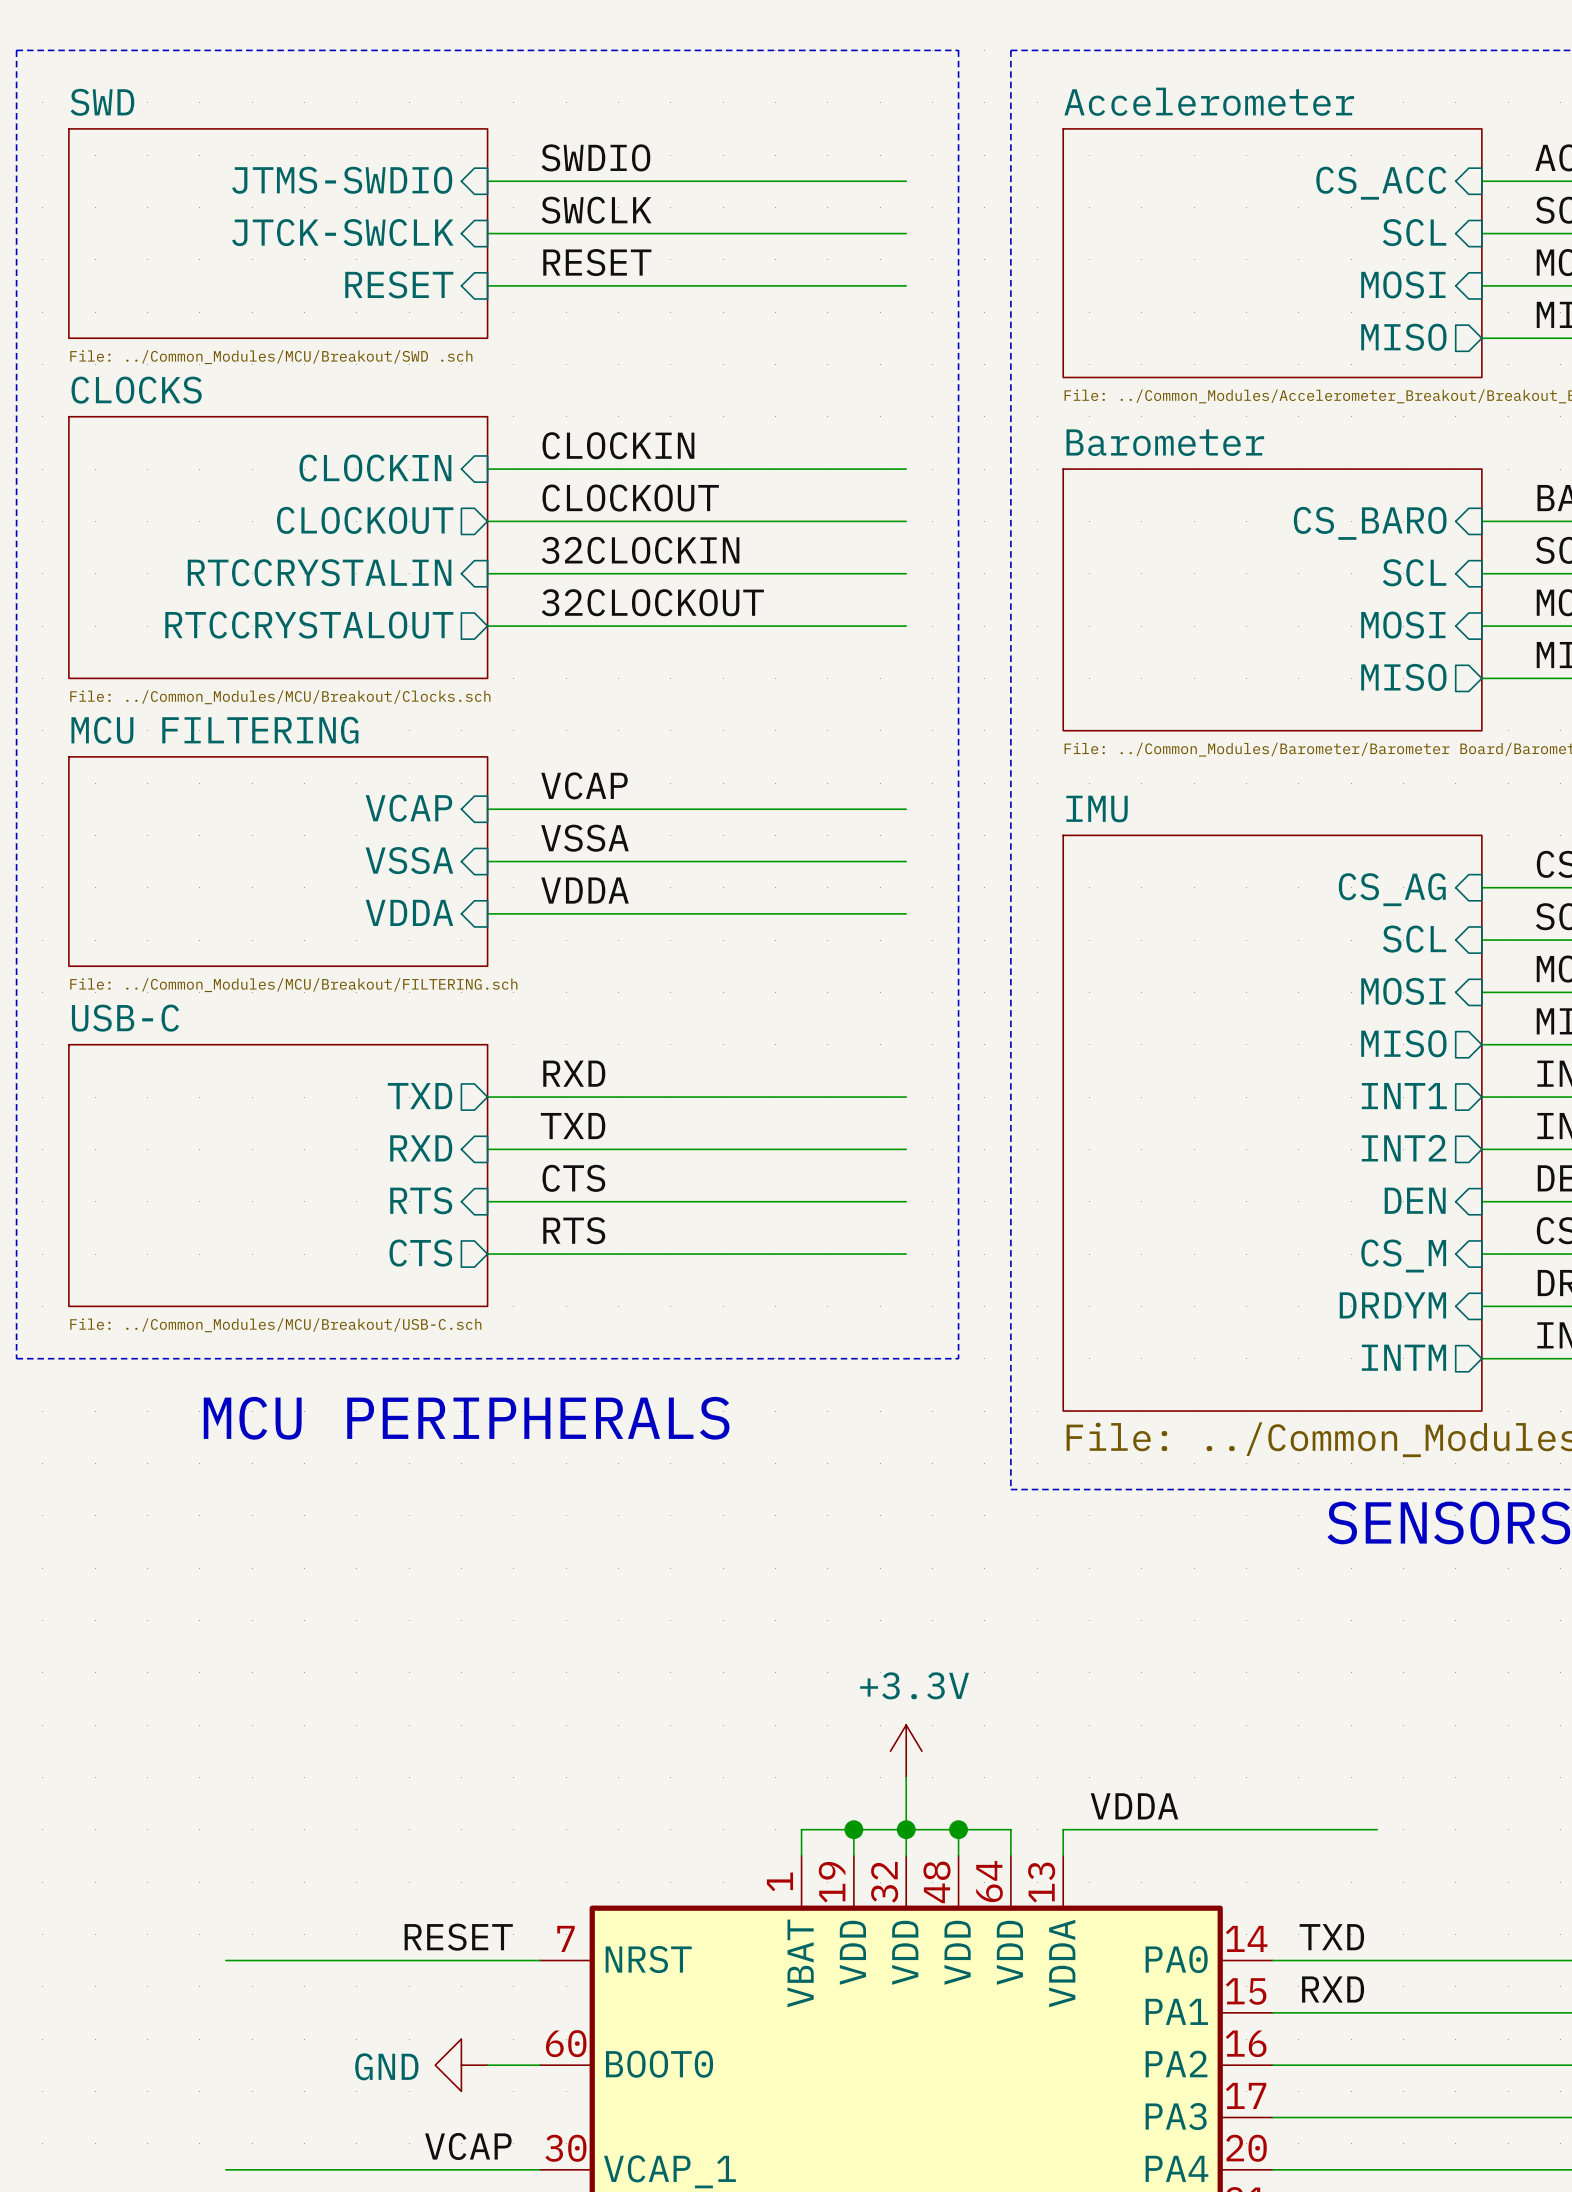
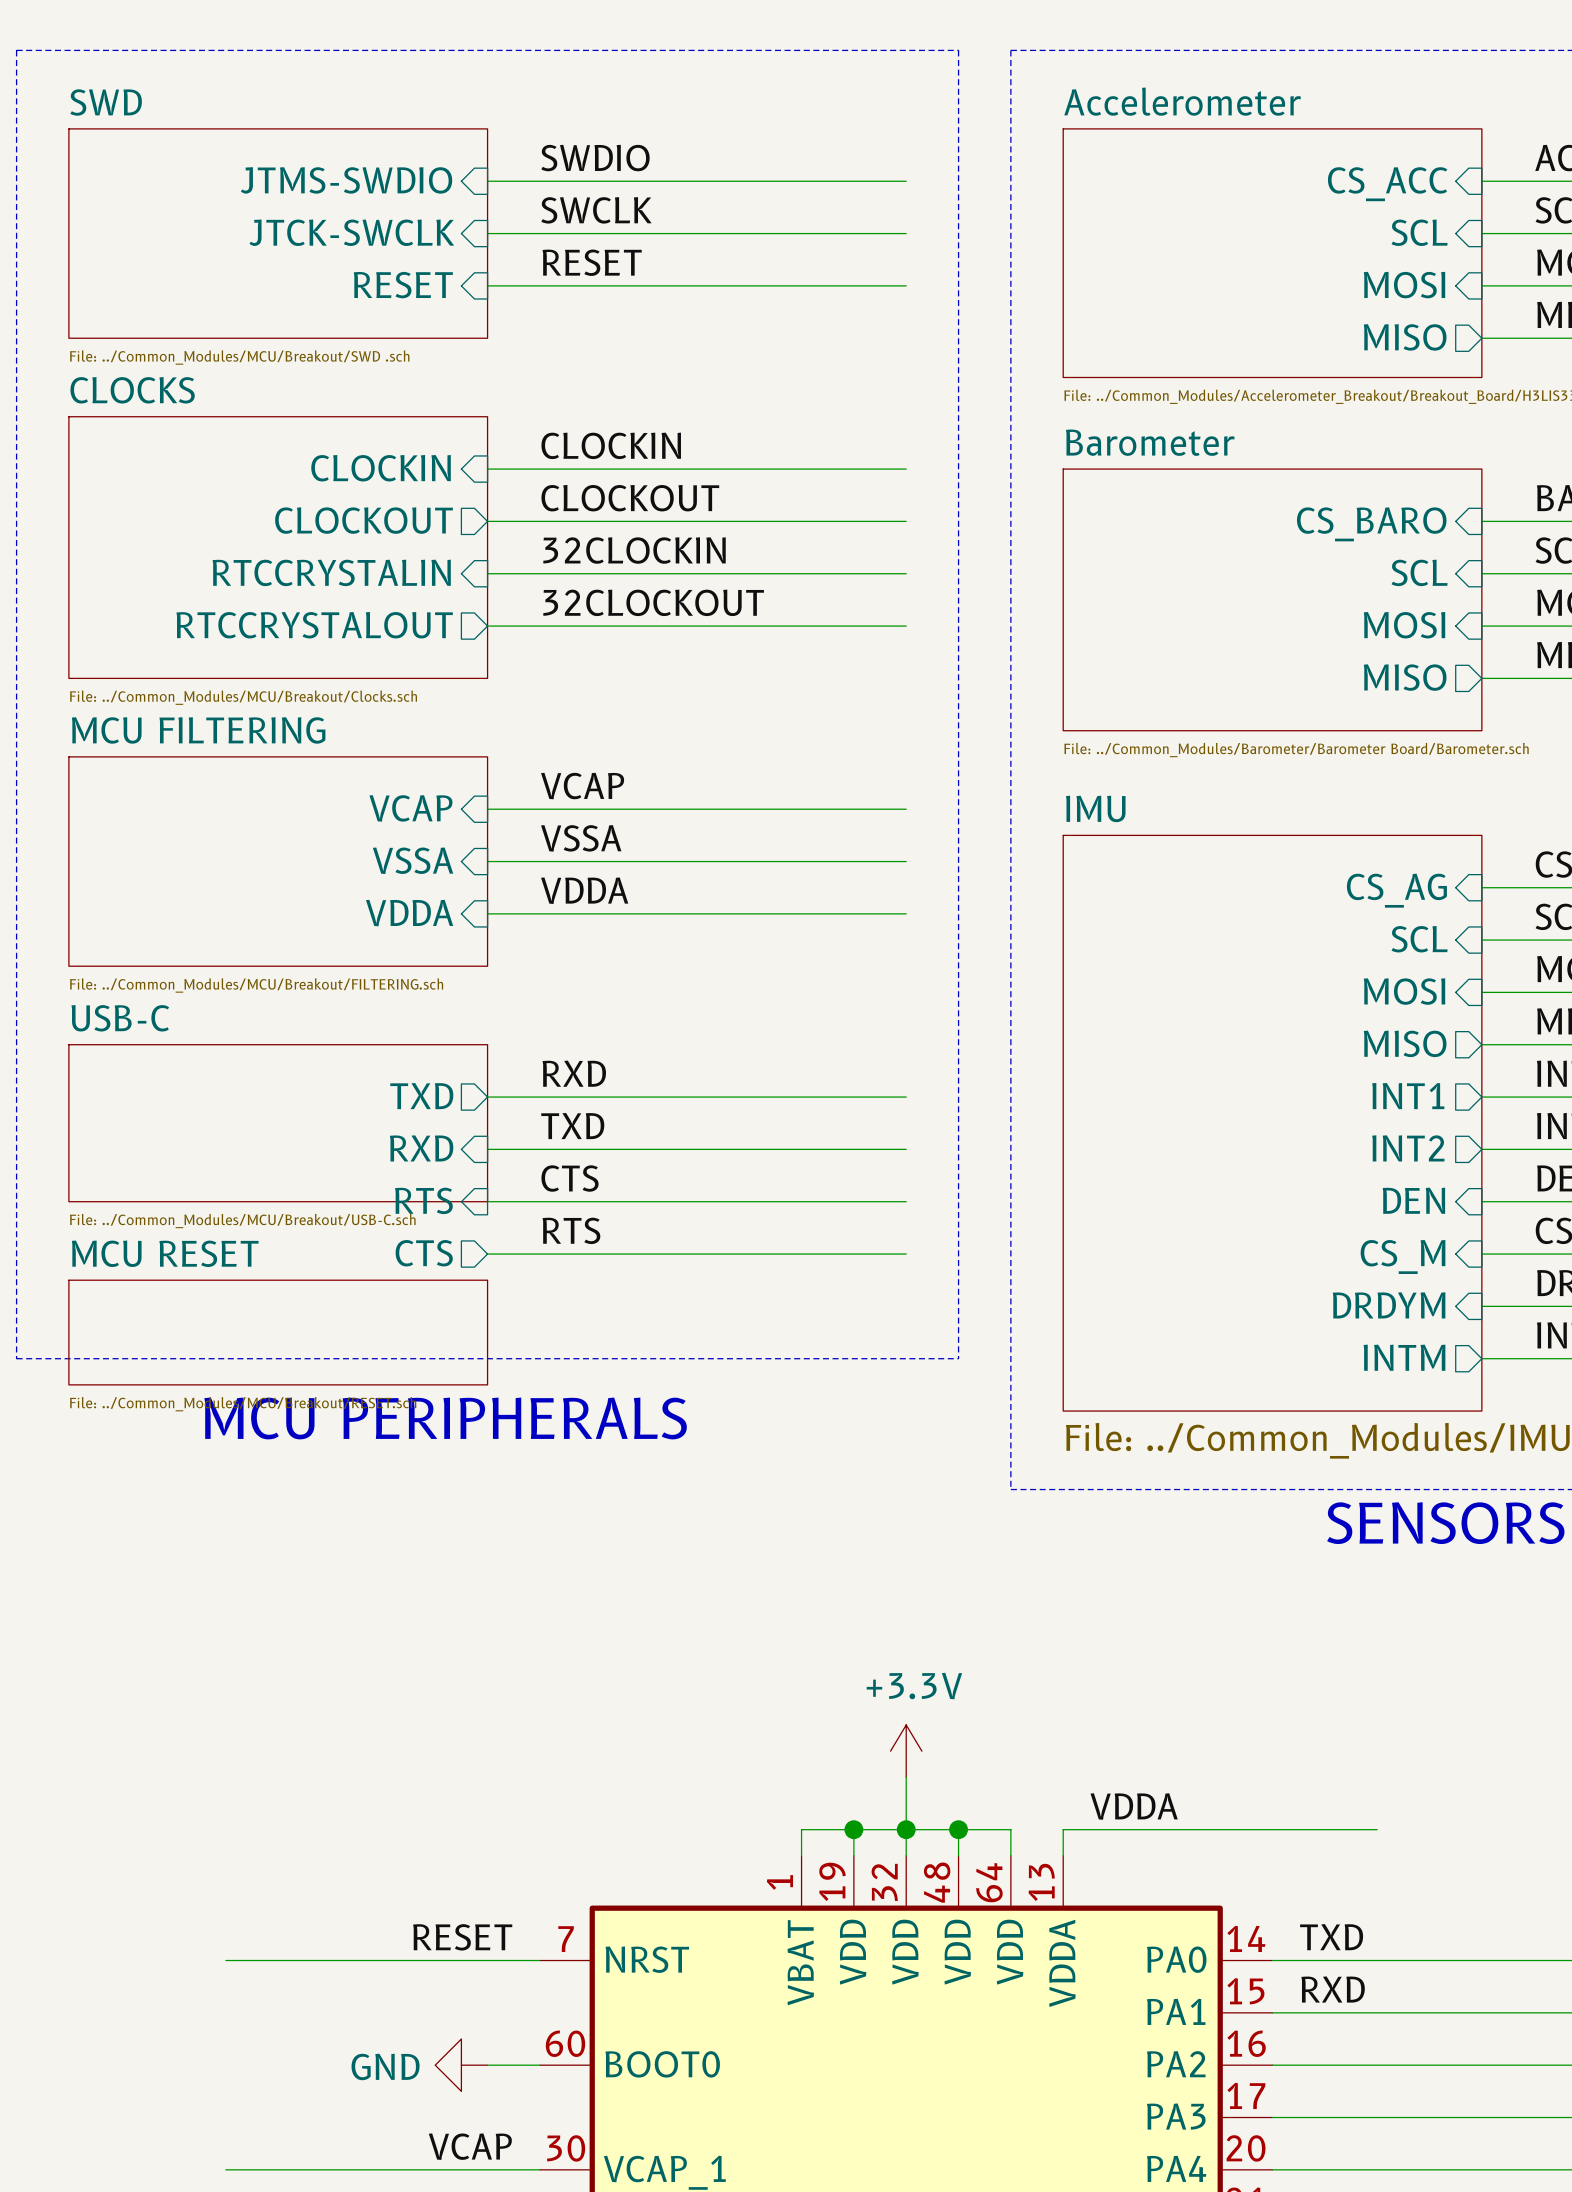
sheet USB-C: none -> File: ../Common_Modules/MCU/Breakout/USB-C.sch (278, 1123)
sheet USB-C: File: ../Common_Modules/MCU/Breakout/USB-C.sch (278, 1175) -> none
sheet MCU RESET: none -> File: ../Common_Modules/MCU/Breakout/RESET.sch (278, 1332)

